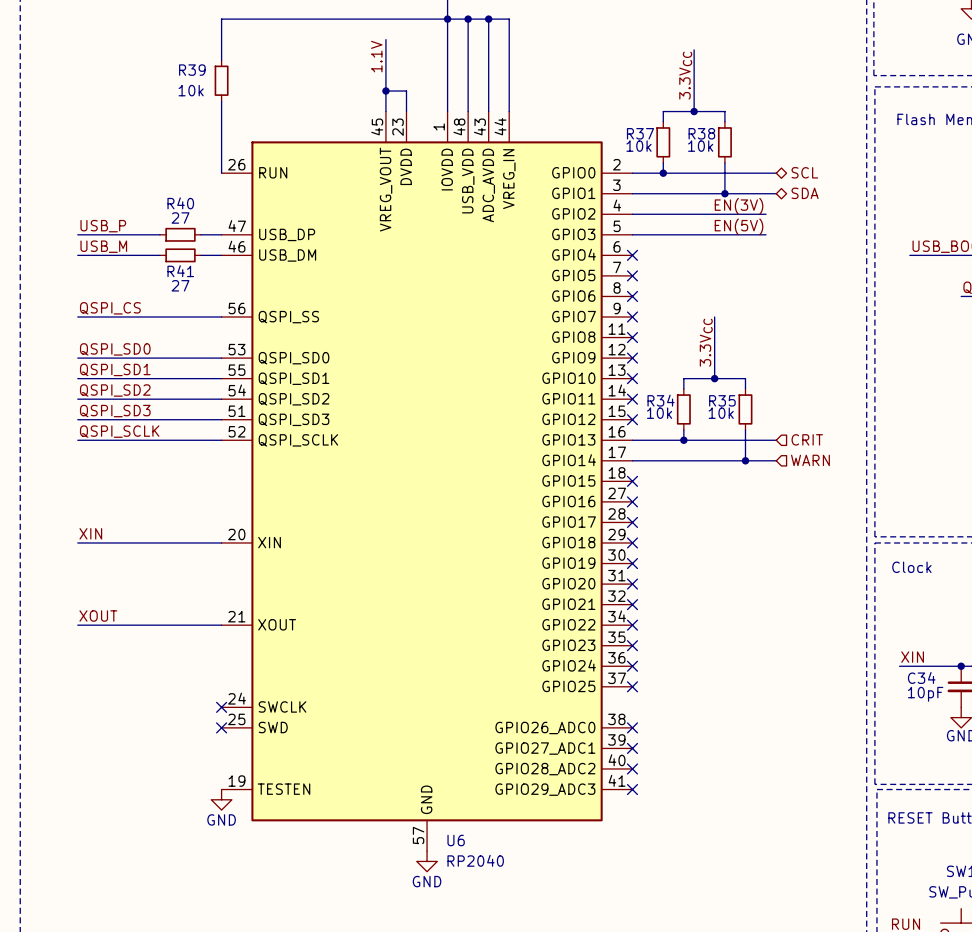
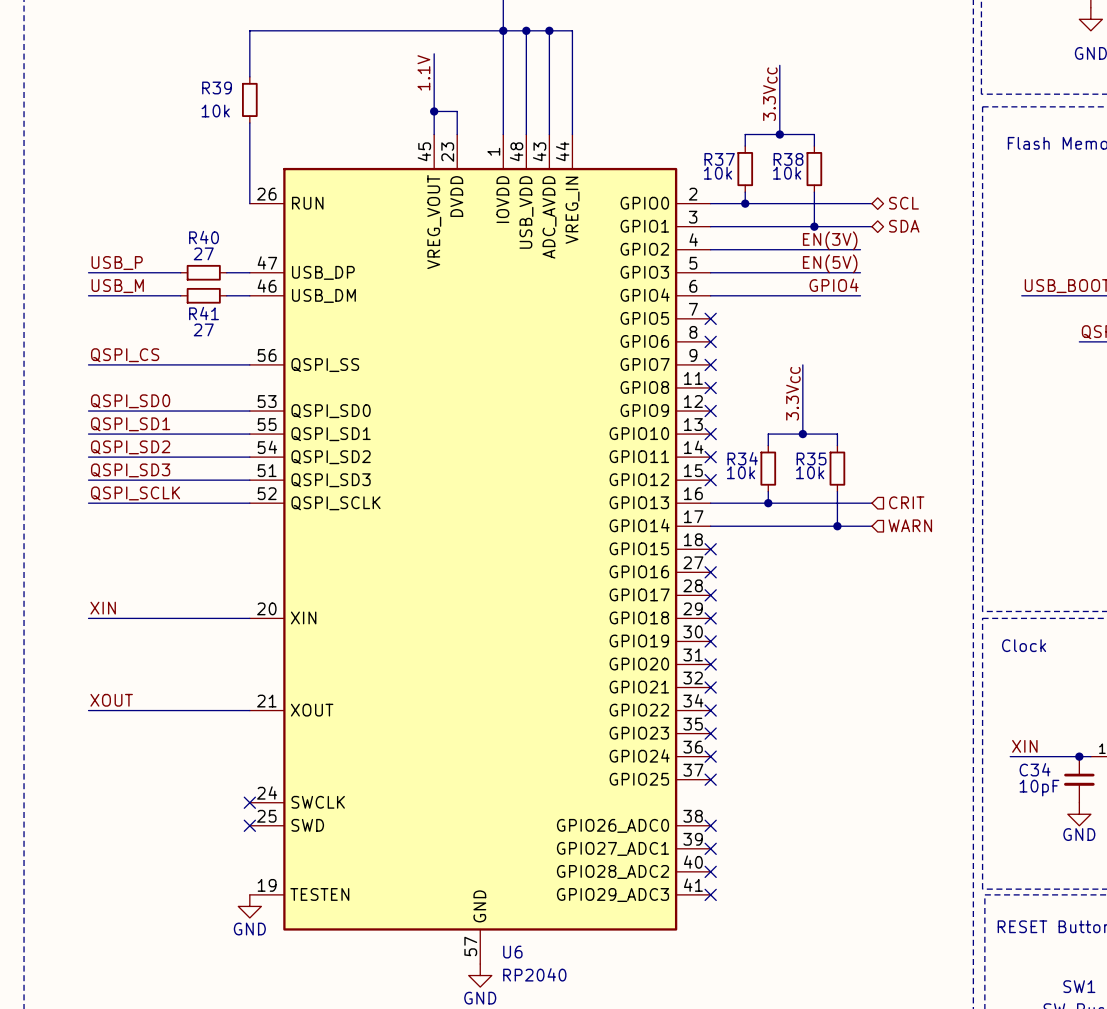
label: none -> GPIO4 (834, 285)
wire: none -> (710, 295) (860, 295)
no-connect mark: (632, 255) -> none

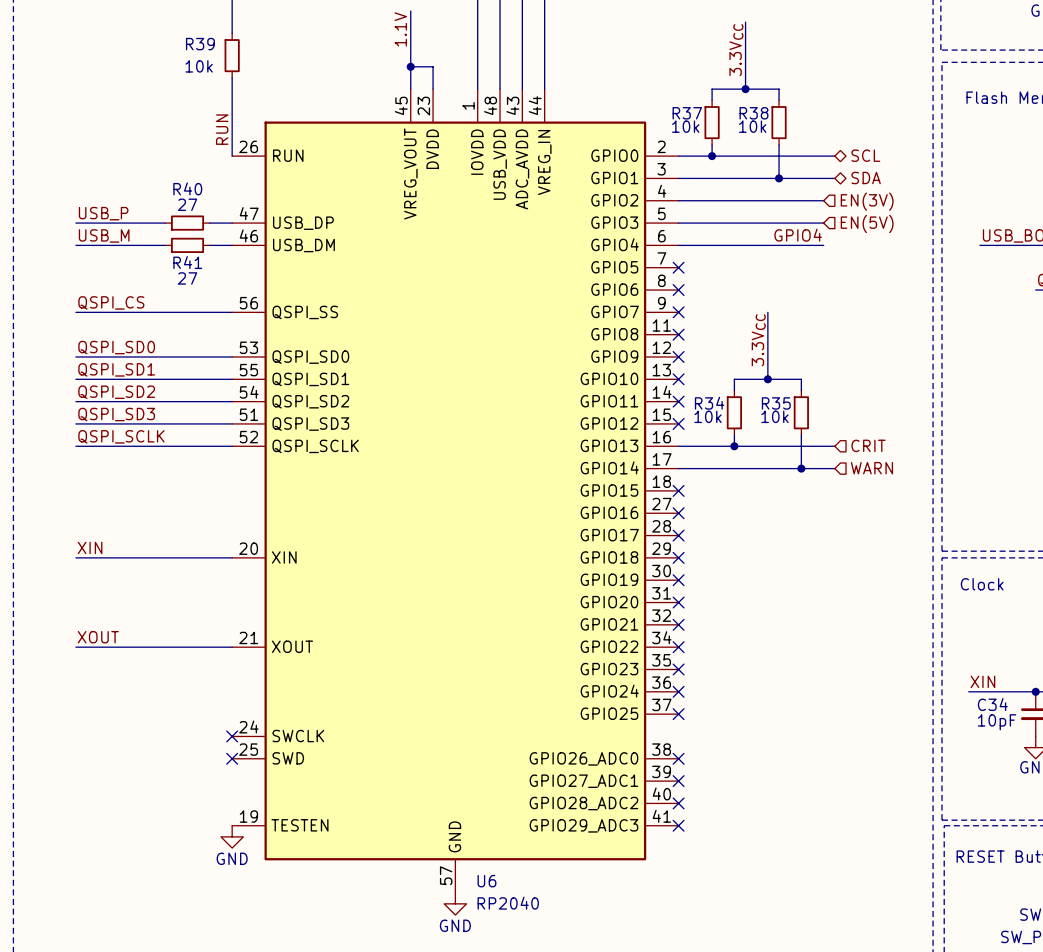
label: none -> RUN (222, 129)
label: EN(3V) (830, 240) -> none
hierarchical label: none -> EN(3V) (867, 201)
label: EN(5V) (830, 263) -> none
hierarchical label: none -> EN(5V) (867, 223)

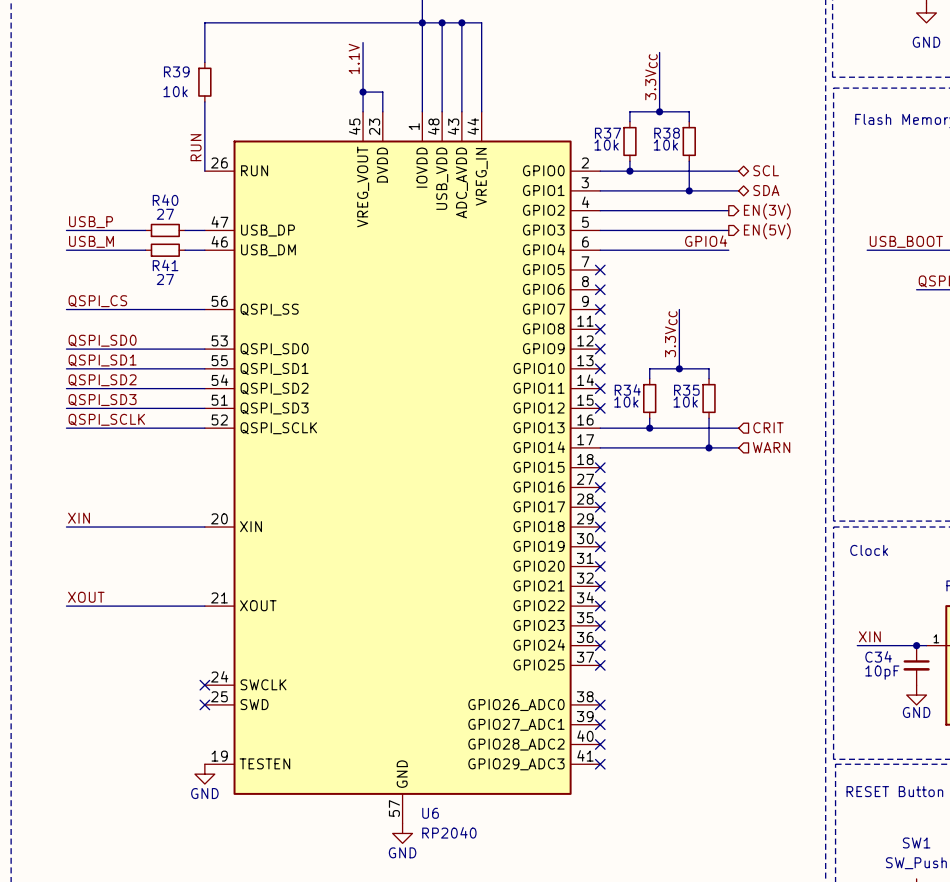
hierarchical label shape: input (867, 201) -> output (767, 211)
hierarchical label shape: input (867, 223) -> output (767, 231)

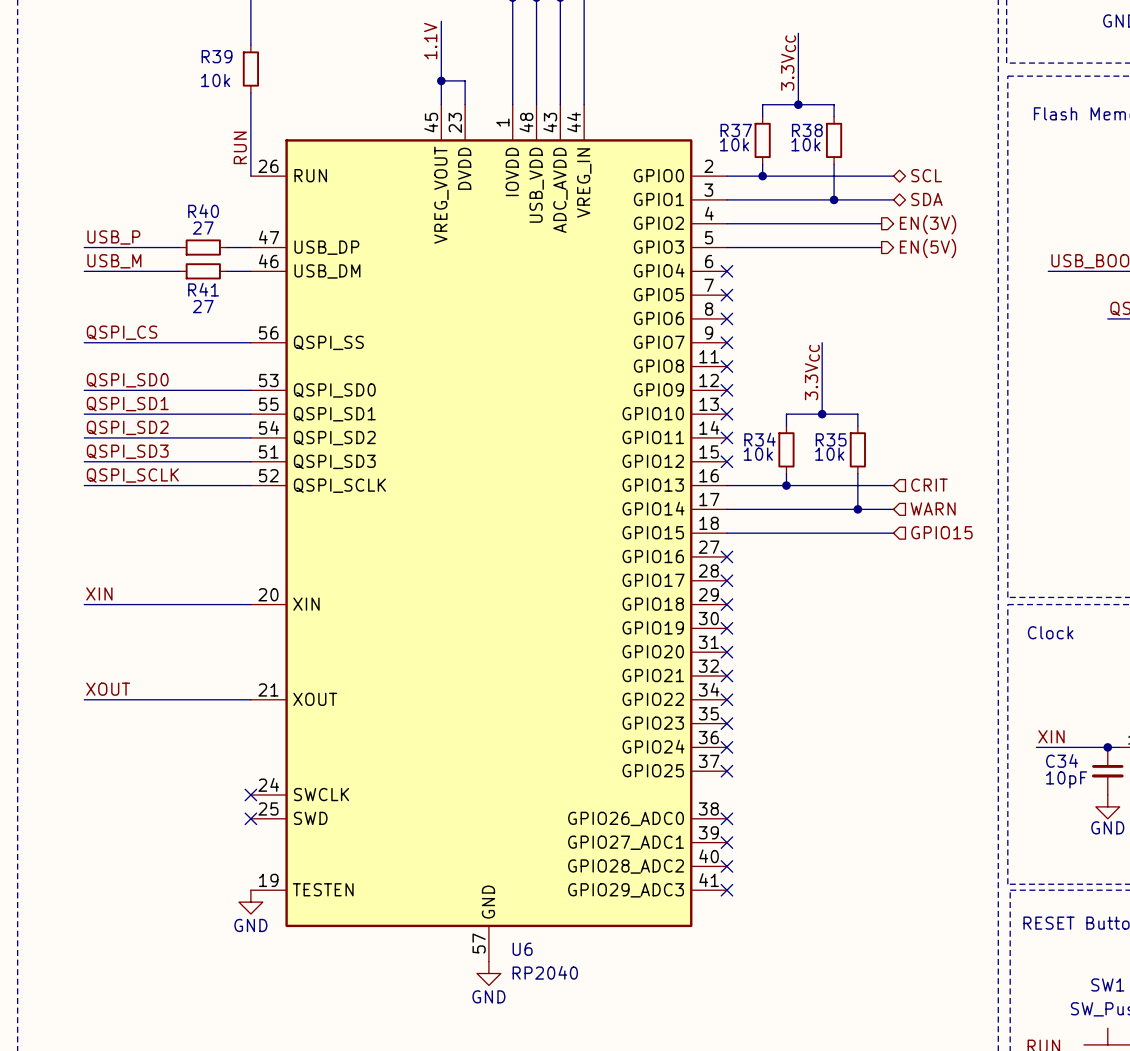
label: GPIO4 (706, 241) -> none
wire: (600, 250) (728, 250) -> none
no-connect mark: none -> (726, 271)
wire: none -> (726, 533) (893, 533)
no-connect mark: (600, 467) -> none
hierarchical label: none -> GPIO15 (941, 532)

